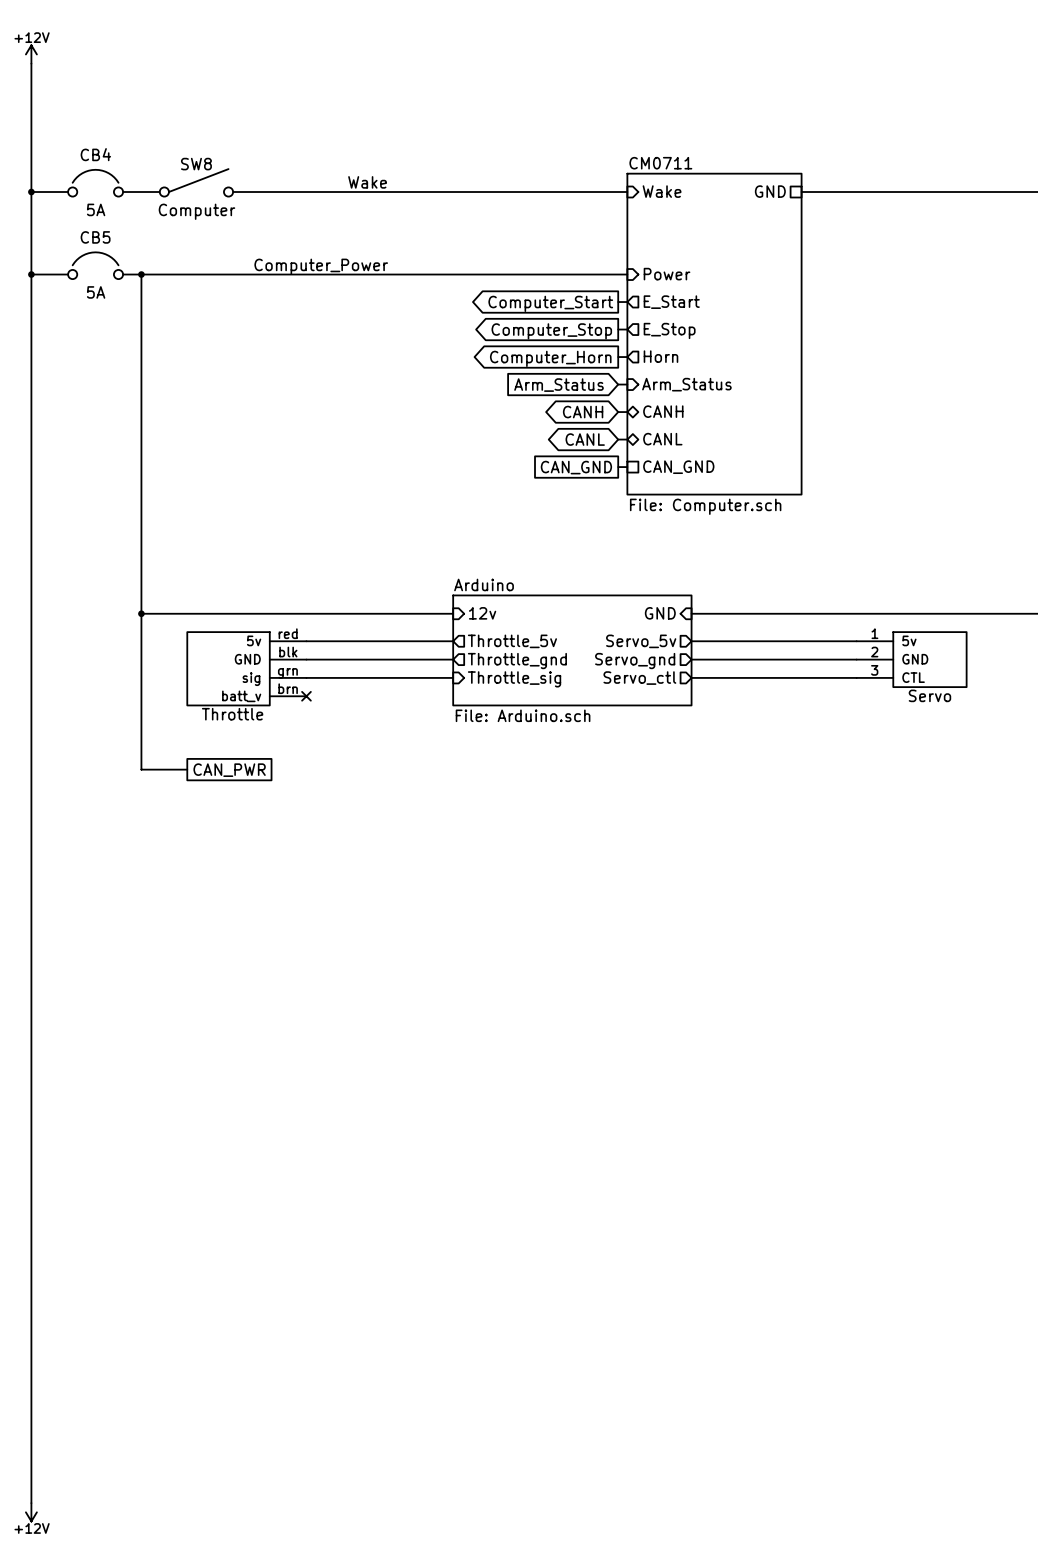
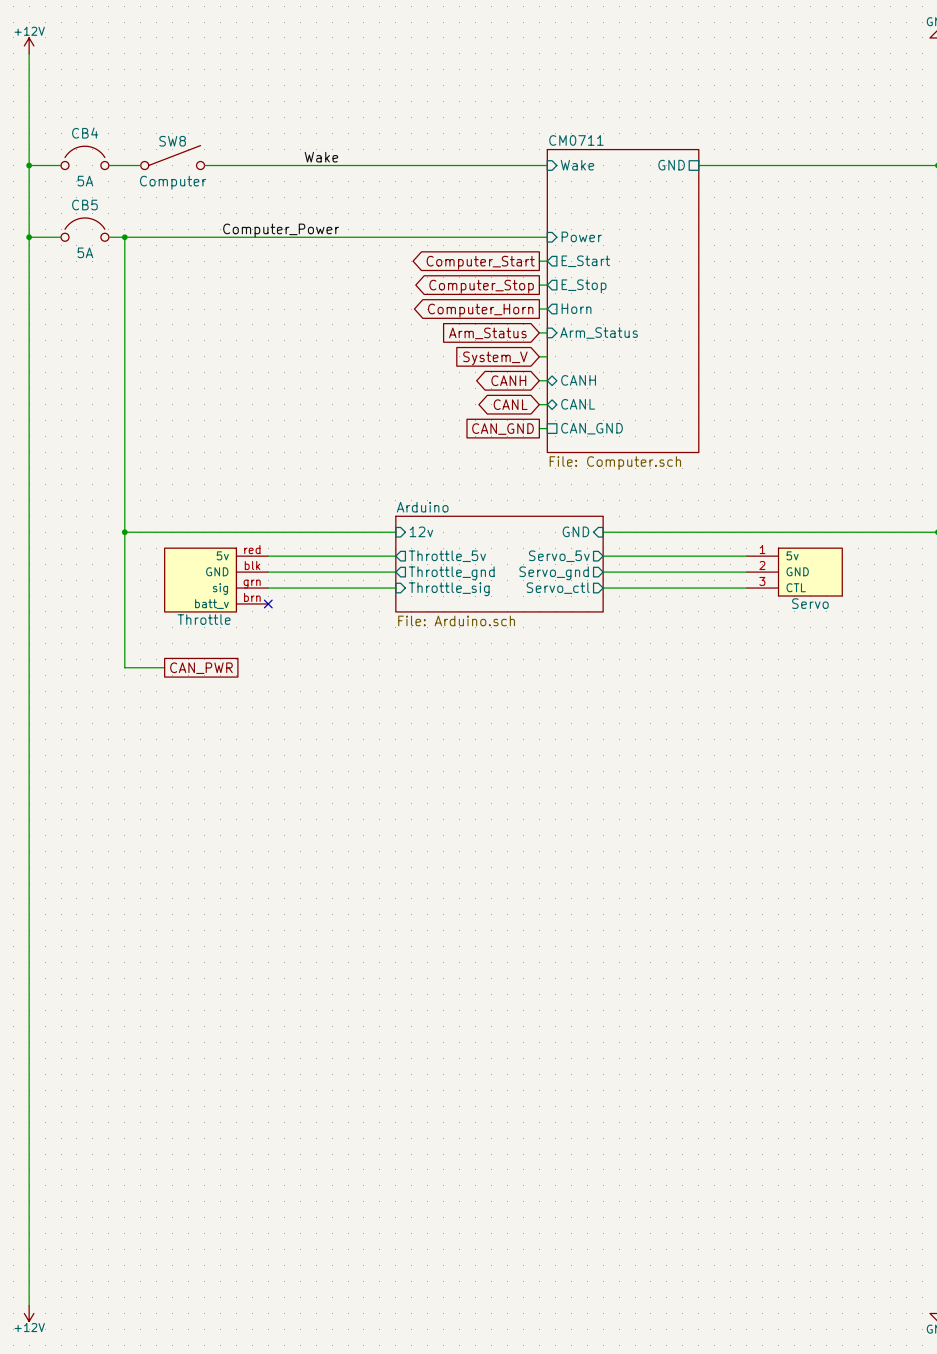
sheet CM0711 shape: [627, 173, 802, 495] -> [547, 149, 699, 453]
sheet pin: CANH (663, 411) -> none
global label shape: bidirectional (583, 412) -> input (495, 358)
global label: CANH (583, 412) -> System_V (495, 358)
global label: CANL (585, 439) -> CANH (508, 380)
sheet pin: CANL (662, 439) -> CANH (578, 380)
global label shape: passive (576, 467) -> bidirectional (510, 404)
global label: CAN_GND (576, 467) -> CANL (510, 404)
sheet pin shape: passive (678, 467) -> bidirectional (578, 404)
sheet pin: CAN_GND (678, 467) -> CANL (578, 404)
wire: none -> (539, 428) (547, 428)
sheet pin: none -> CAN_GND (592, 428)
global label: none -> CAN_GND (503, 429)

